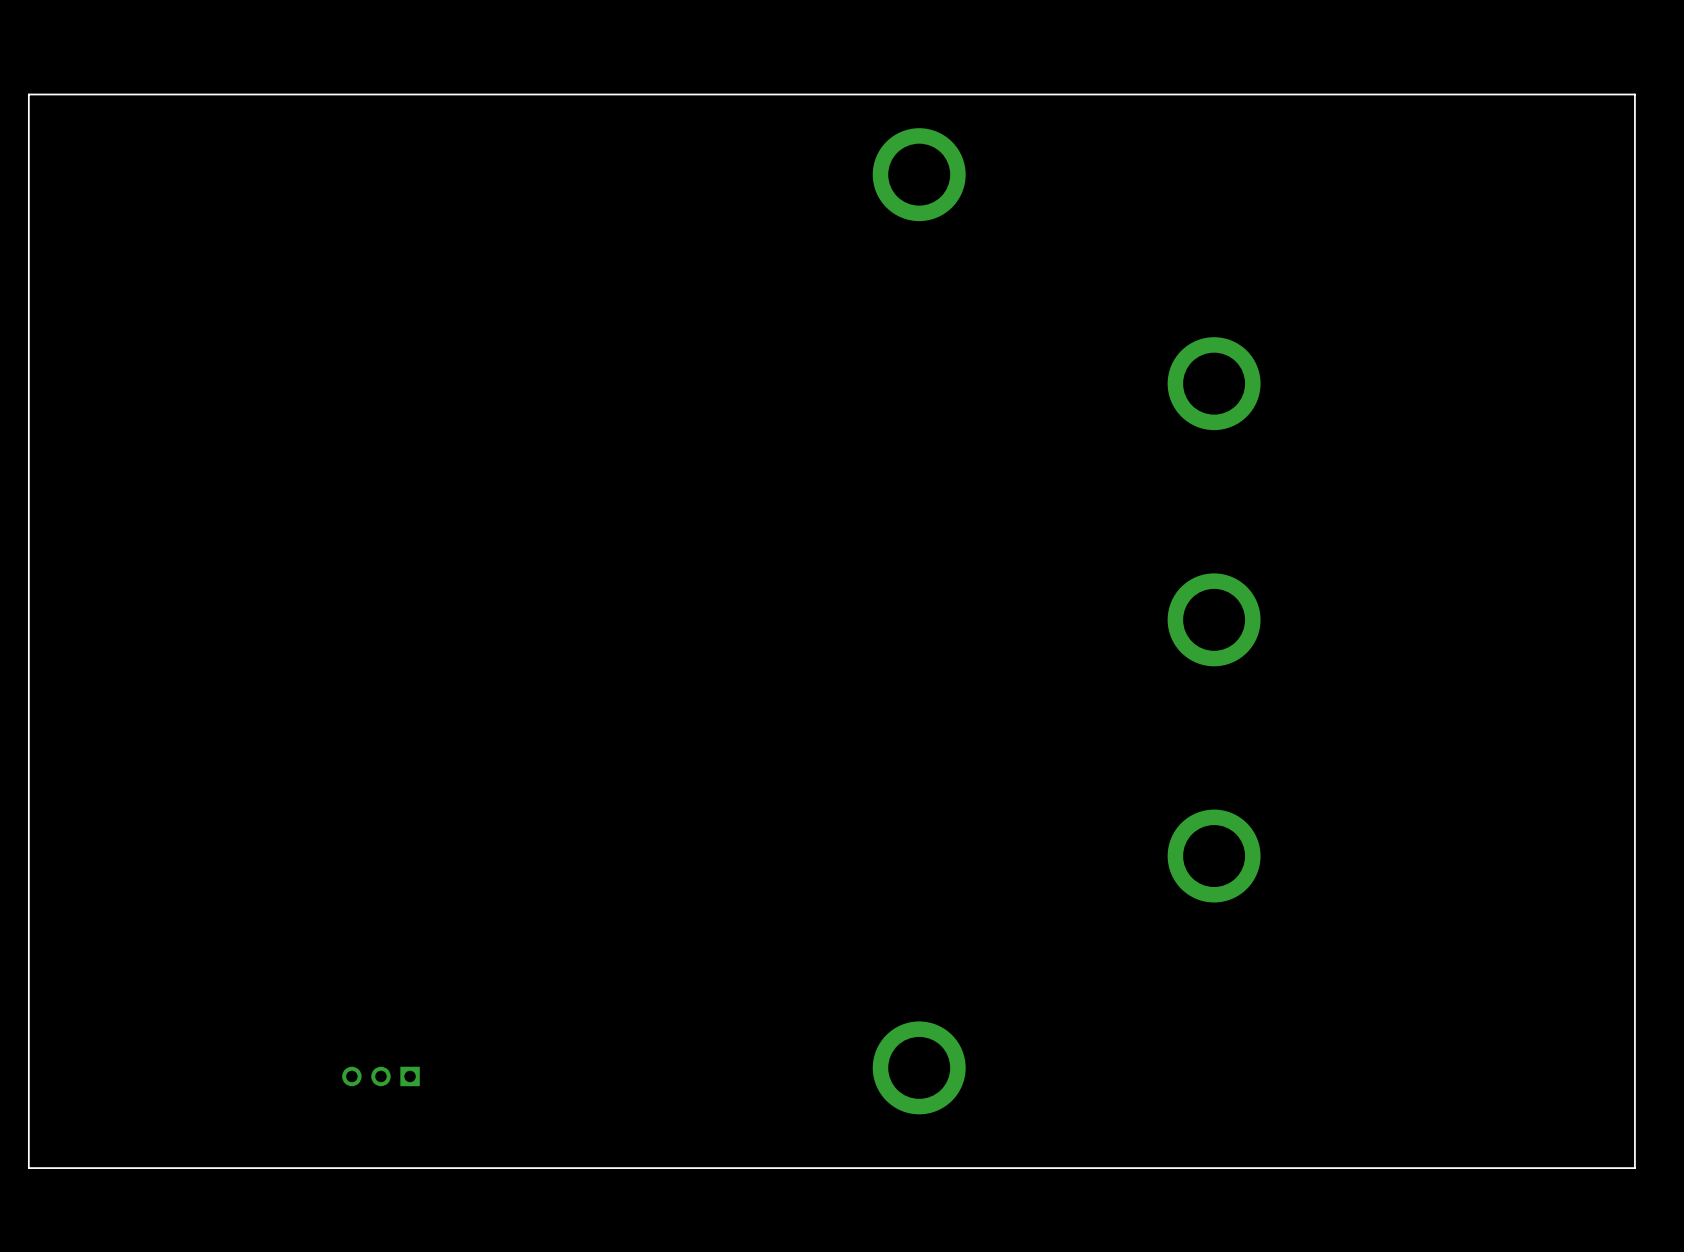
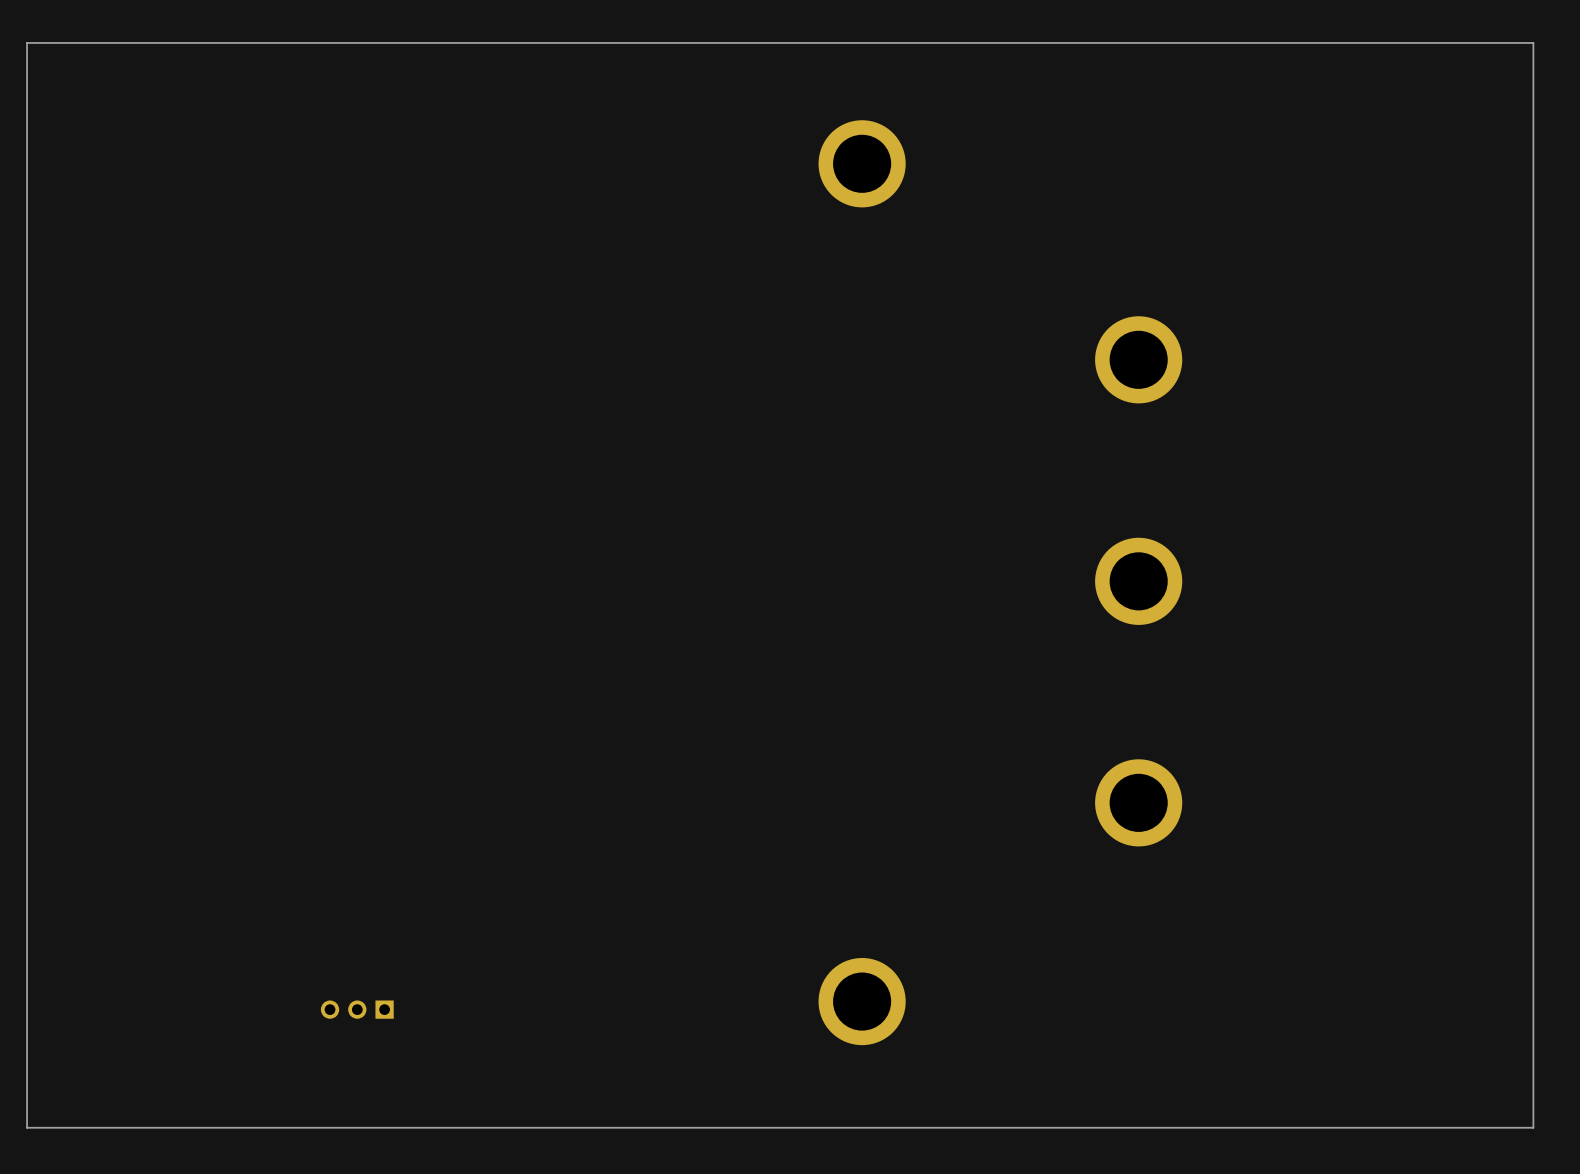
board edge: (1634, 94) (28, 94) -> (1533, 88) (1533, 42) (27, 42) (27, 88)
board edge: (1634, 1168) (28, 1168) -> (1533, 1095) (1533, 1127) (27, 1127) (27, 1095)

